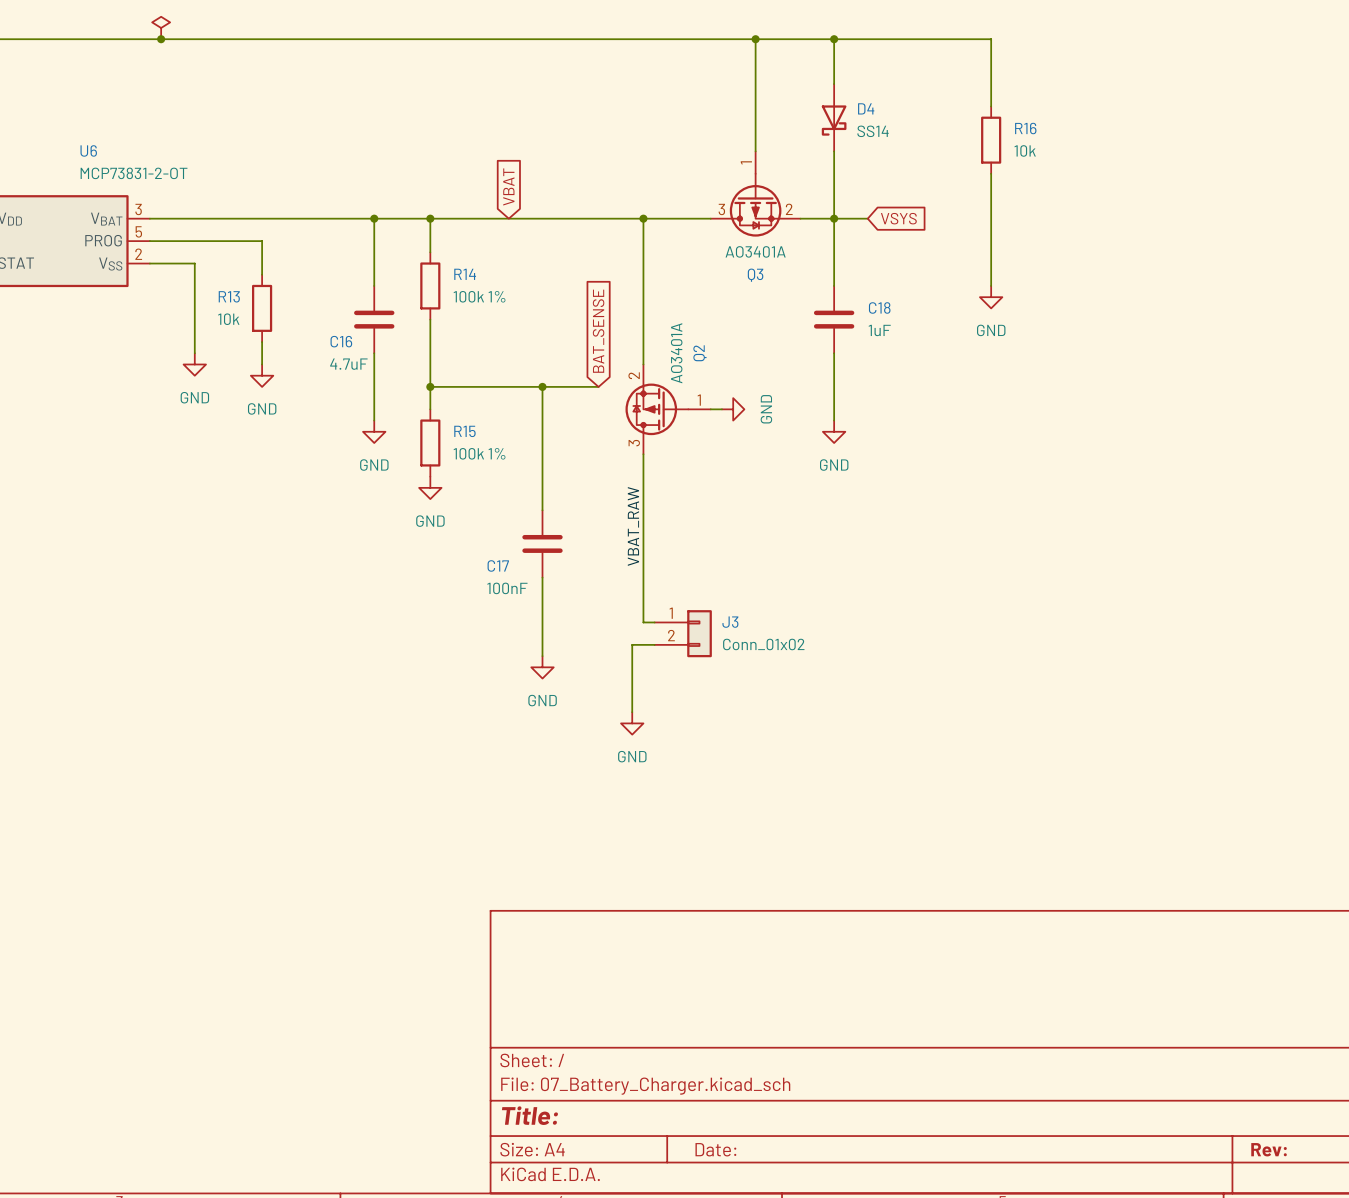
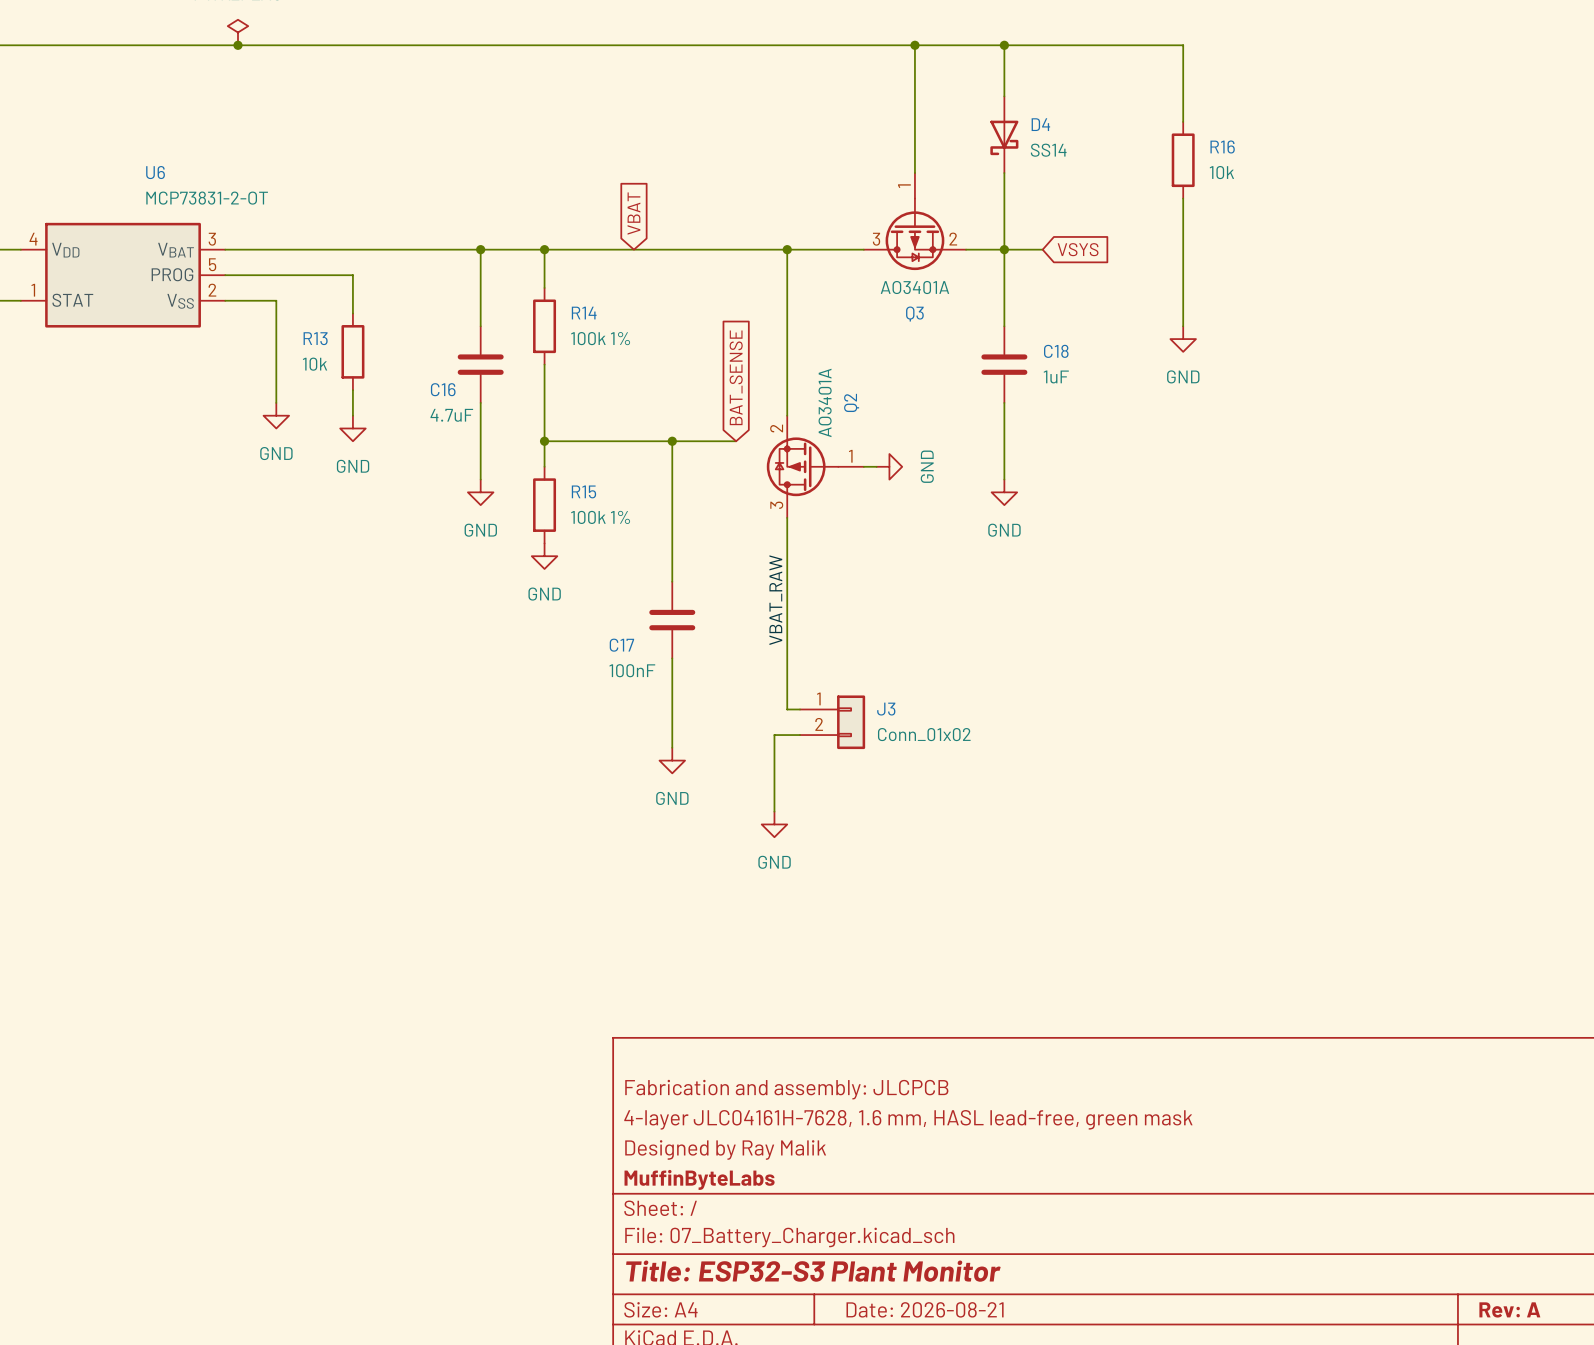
title block: none -> Fabrication and assembly: JLCPCB (786, 1089)
title block: none -> 4-layer JLC04161H-7628, 1.6 mm, HASL lead-free, green mask (908, 1119)
title block: none -> Designed by Ray Malik (725, 1149)
title block: none -> MuffinByteLabs (699, 1179)
title block: Title: (529, 1115) -> Title: ESP32-S3 Plant Monitor (813, 1271)
title block: Date: (715, 1149) -> Date: 2026-08-21 (925, 1309)
title block: Rev: (1269, 1149) -> Rev: A (1509, 1309)

